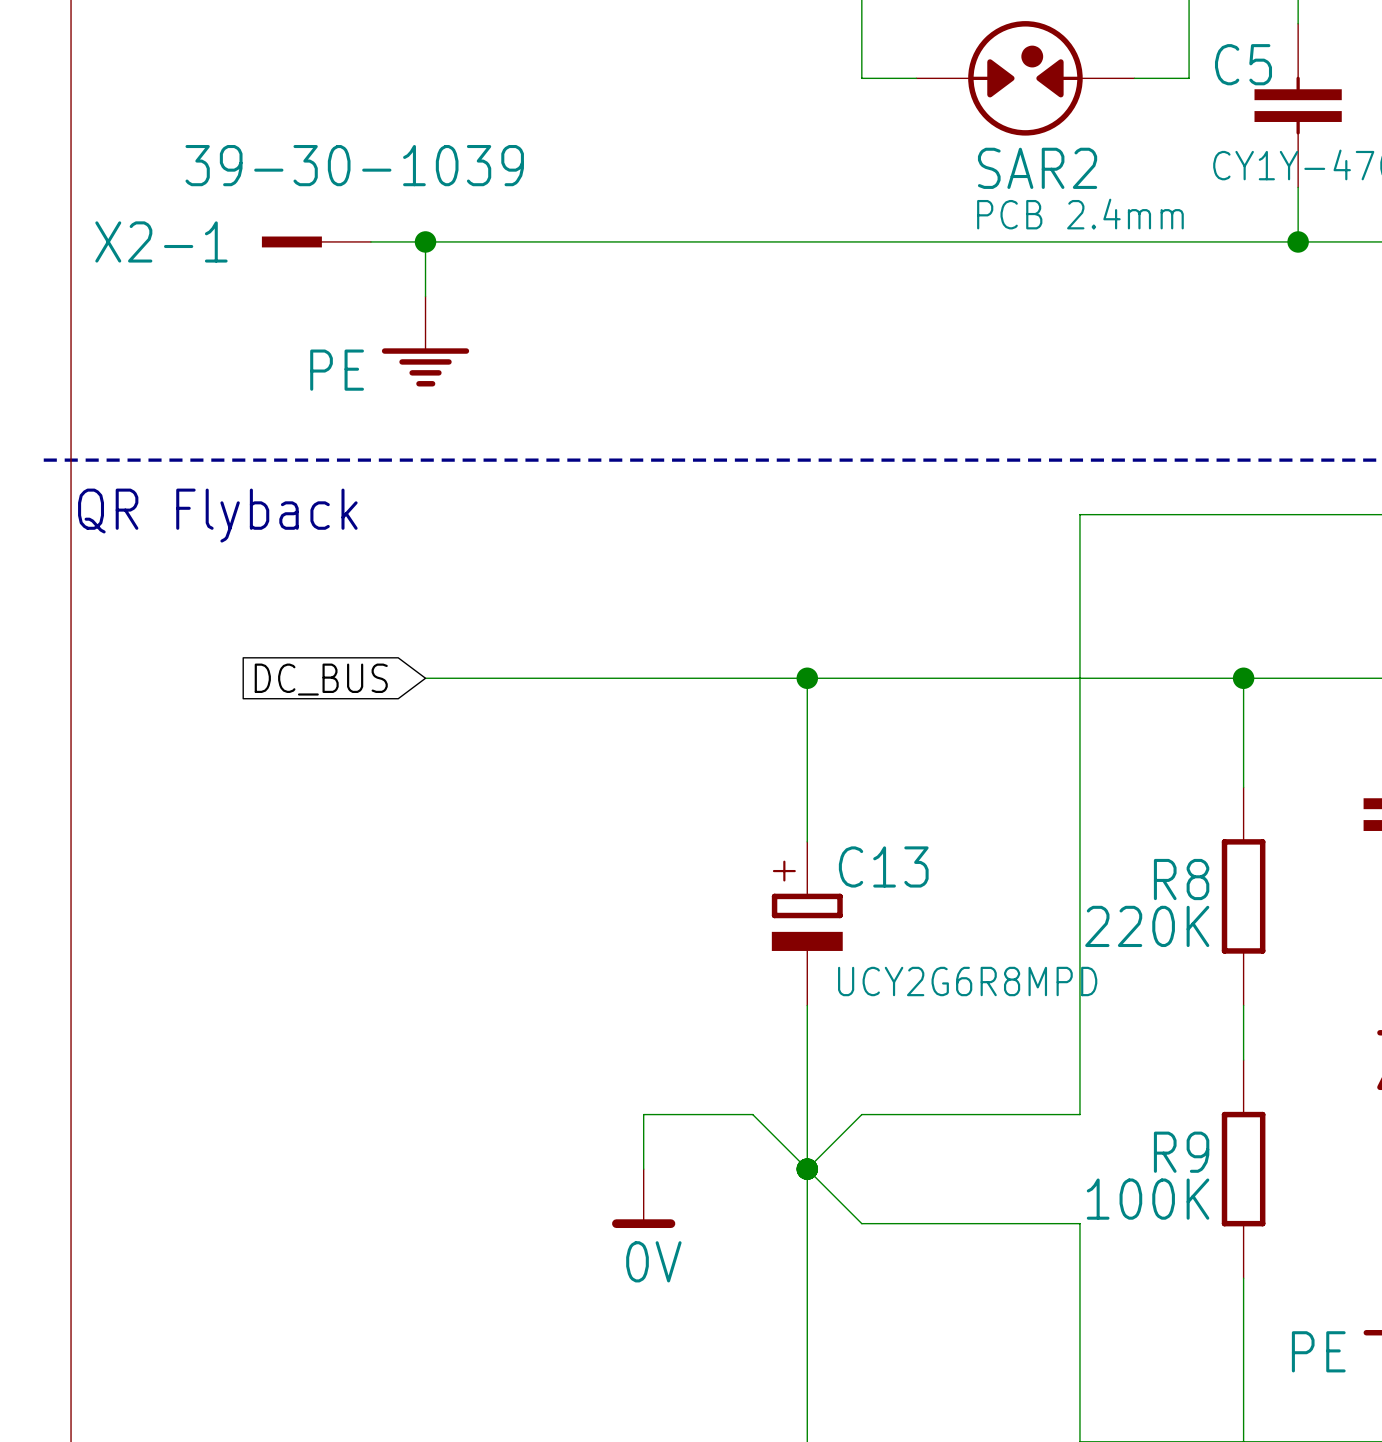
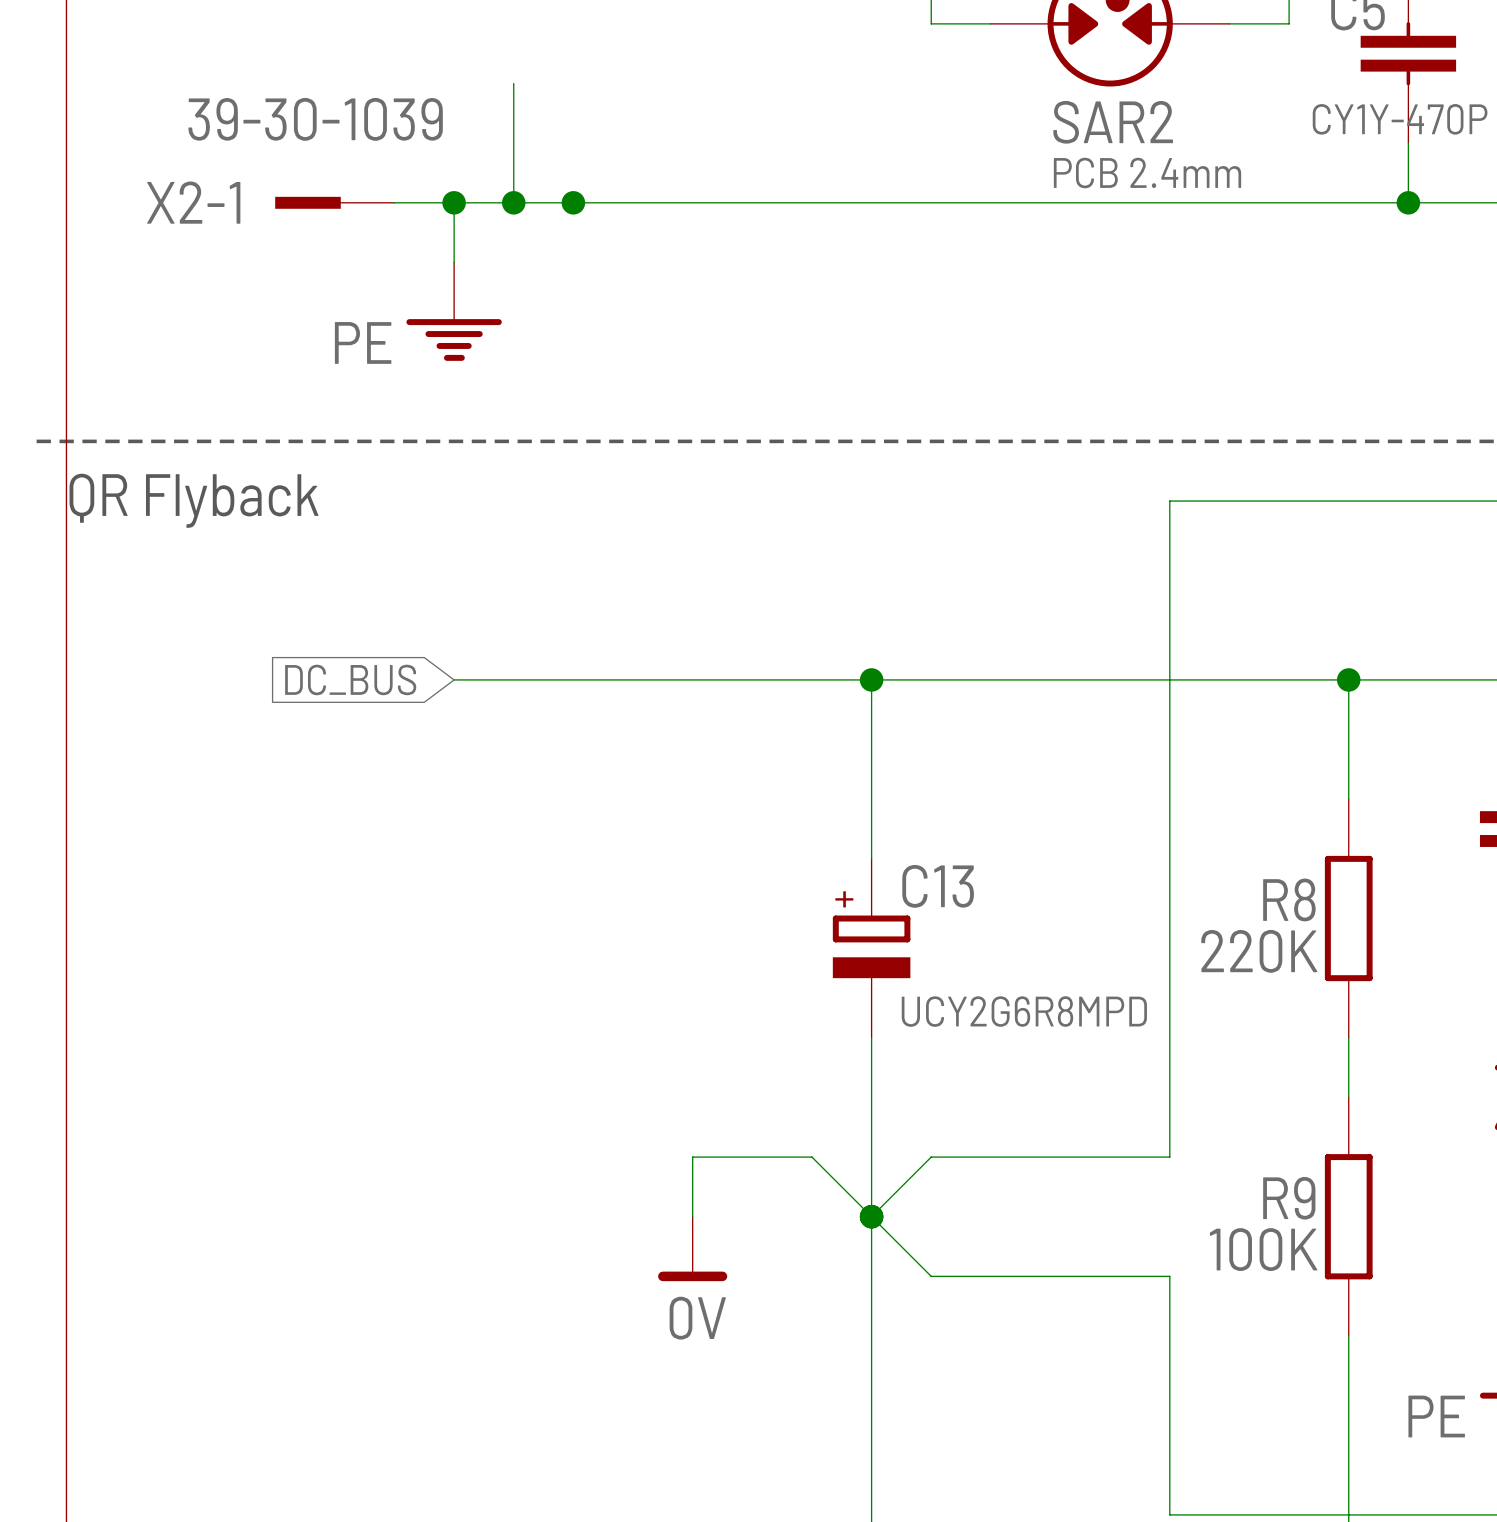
wire: none -> (513, 83) (513, 202)
junction: none -> (513, 202)
junction: none -> (573, 202)

